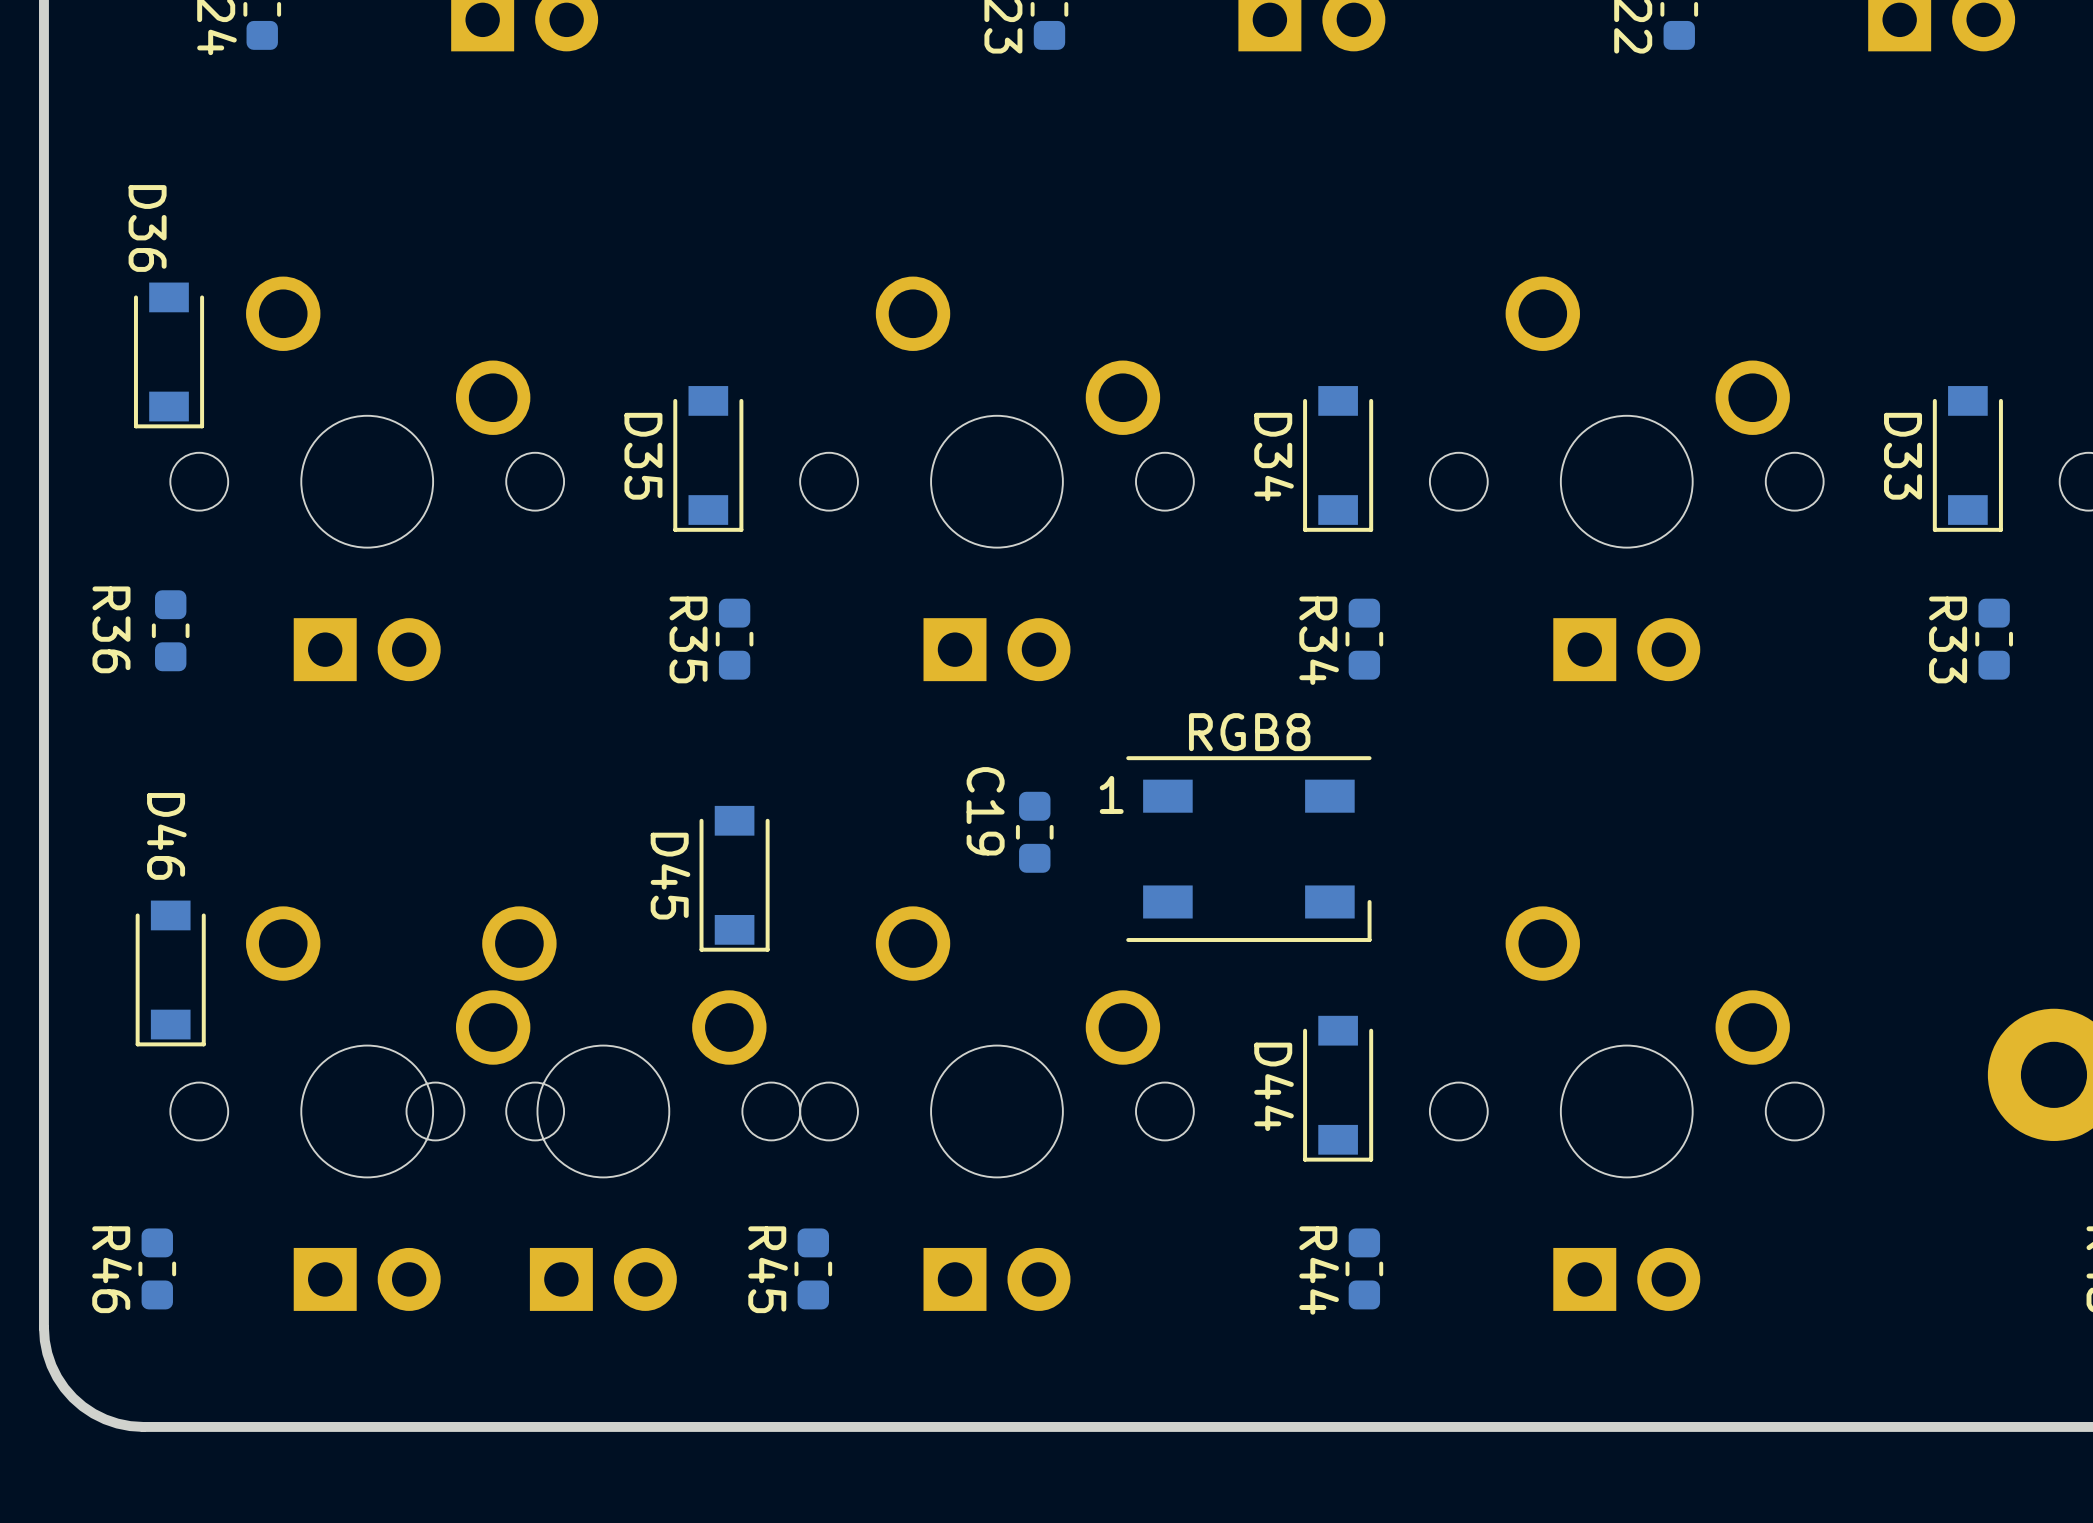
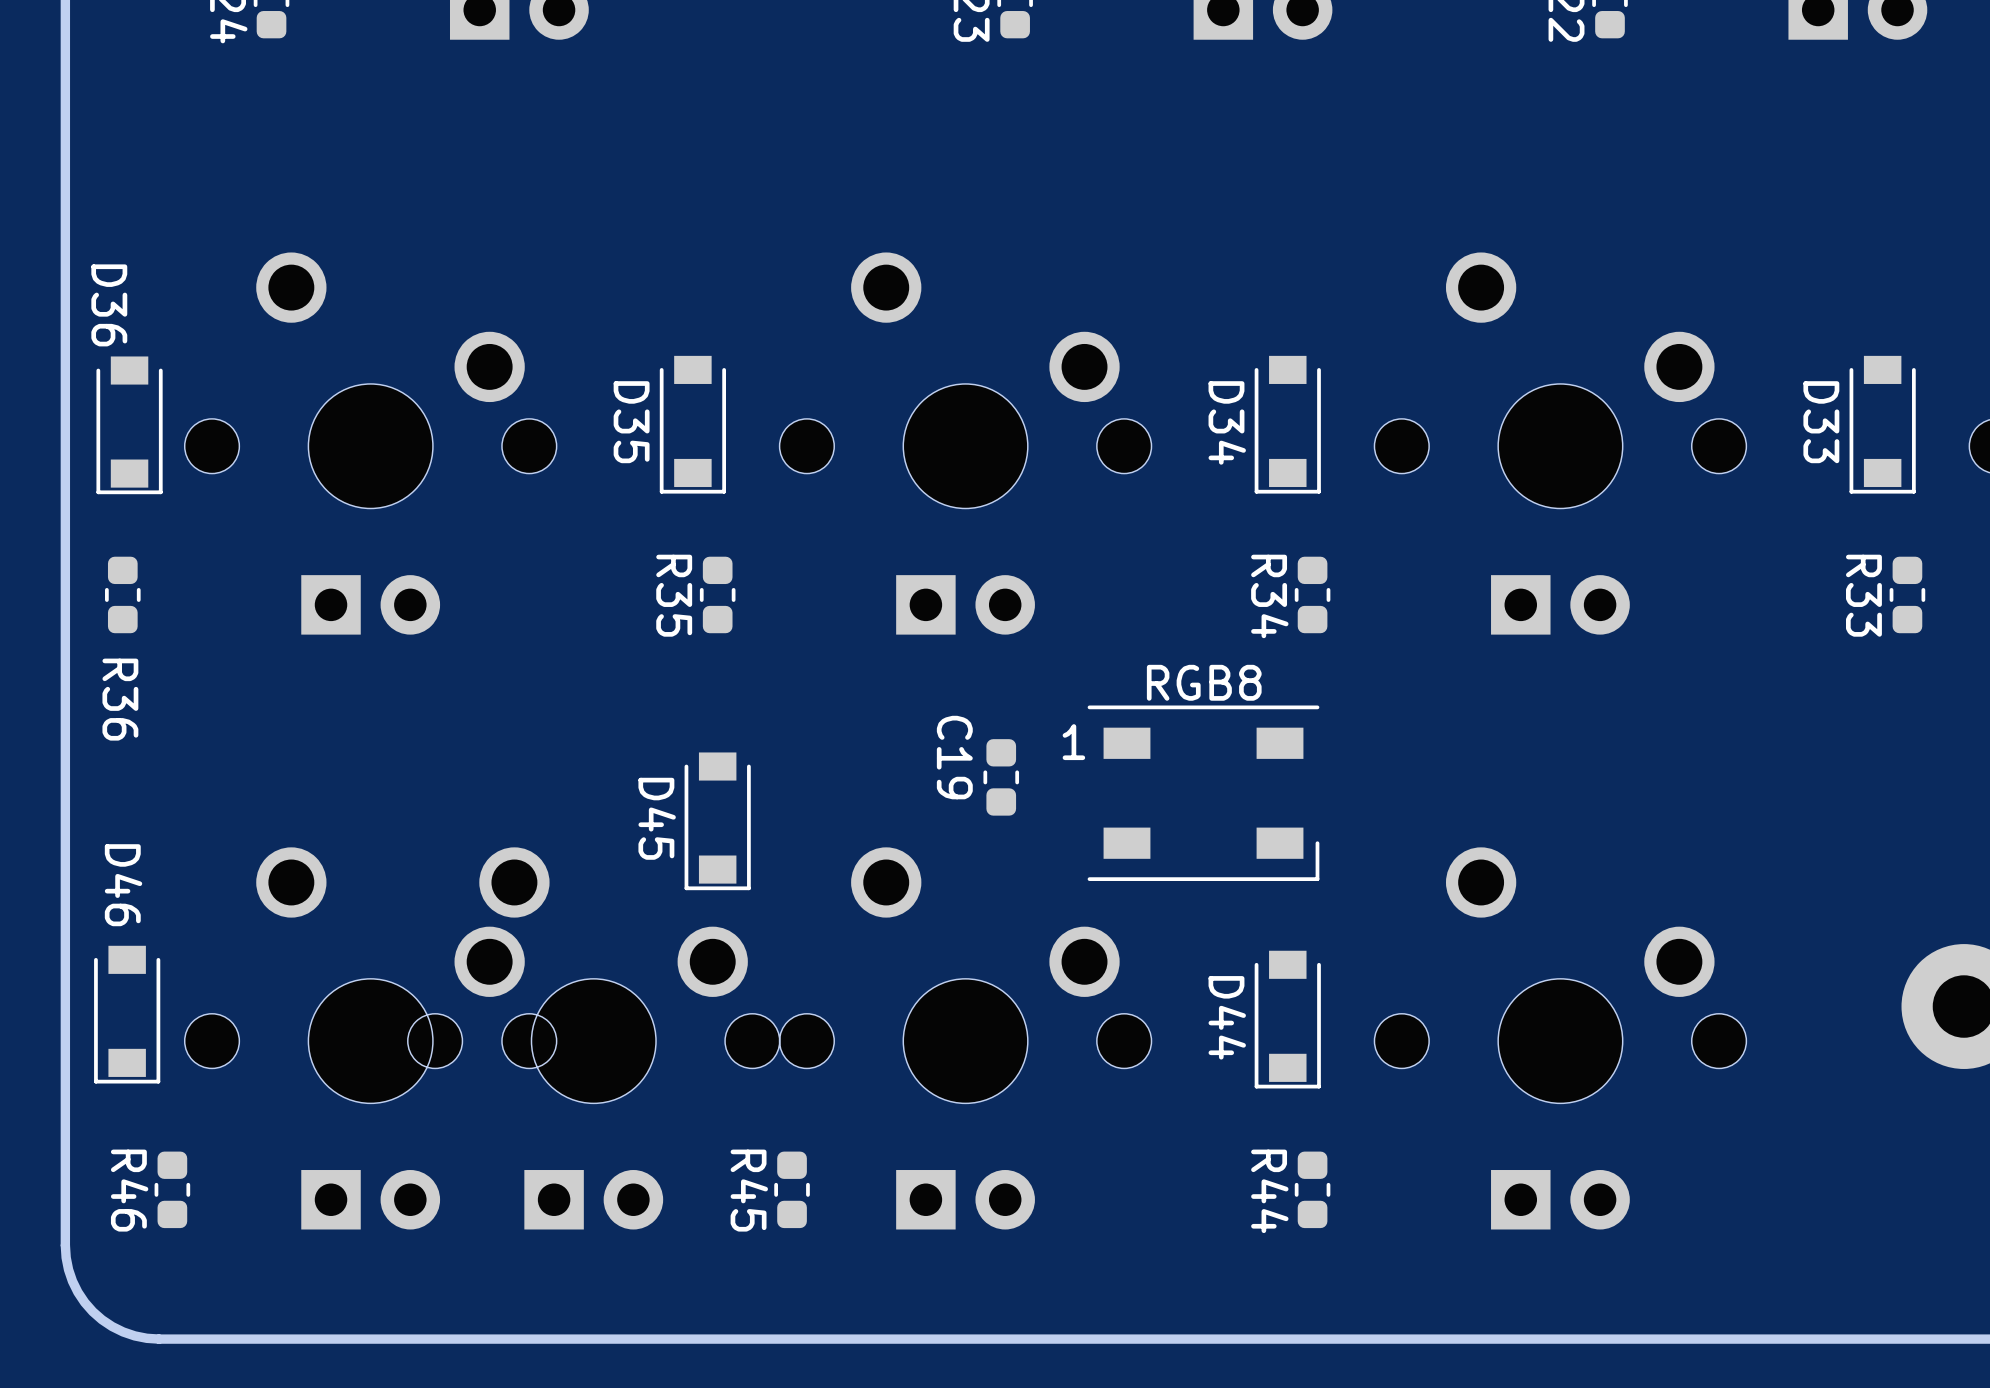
D36 position: (169, 355) -> (129, 425)
R36 name position: R36 (111, 629) -> R36 (120, 699)
R36 position: (170, 630) -> (122, 594)
D46 position: (170, 973) -> (127, 1014)

